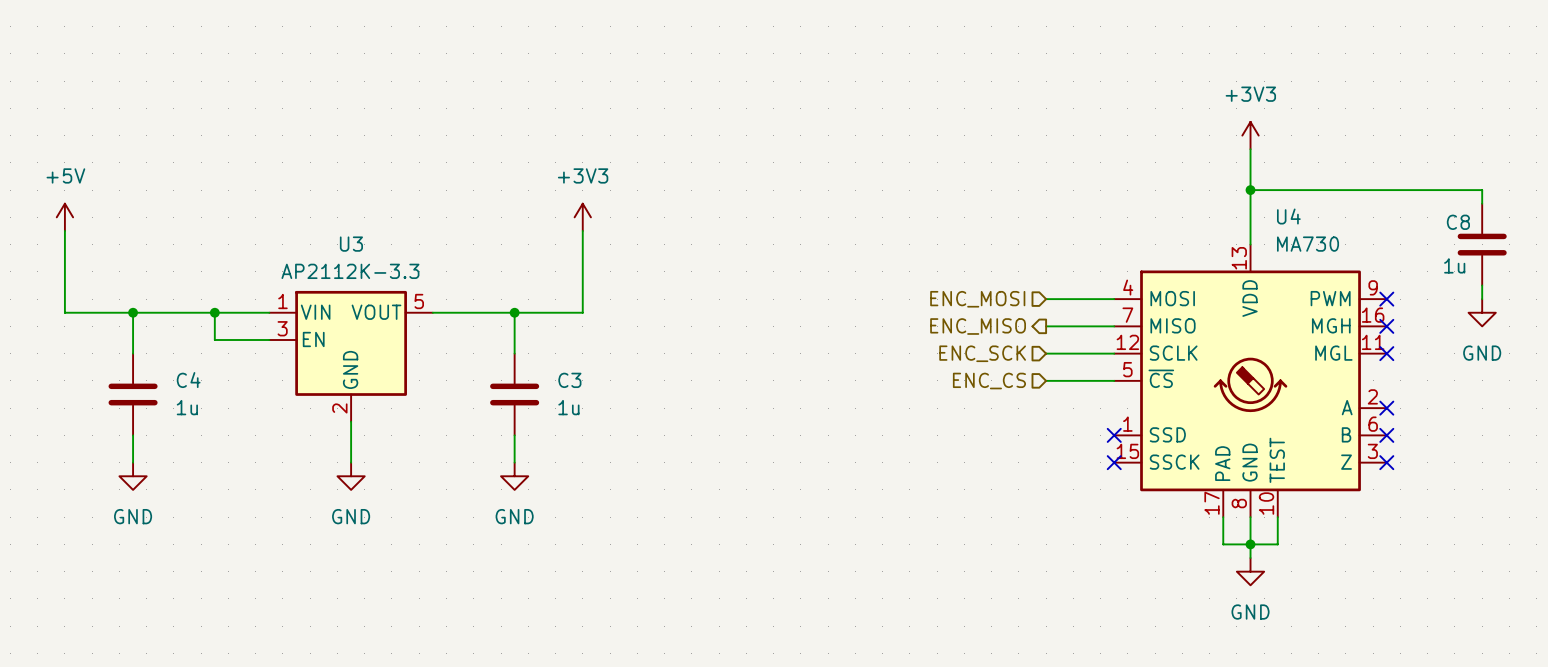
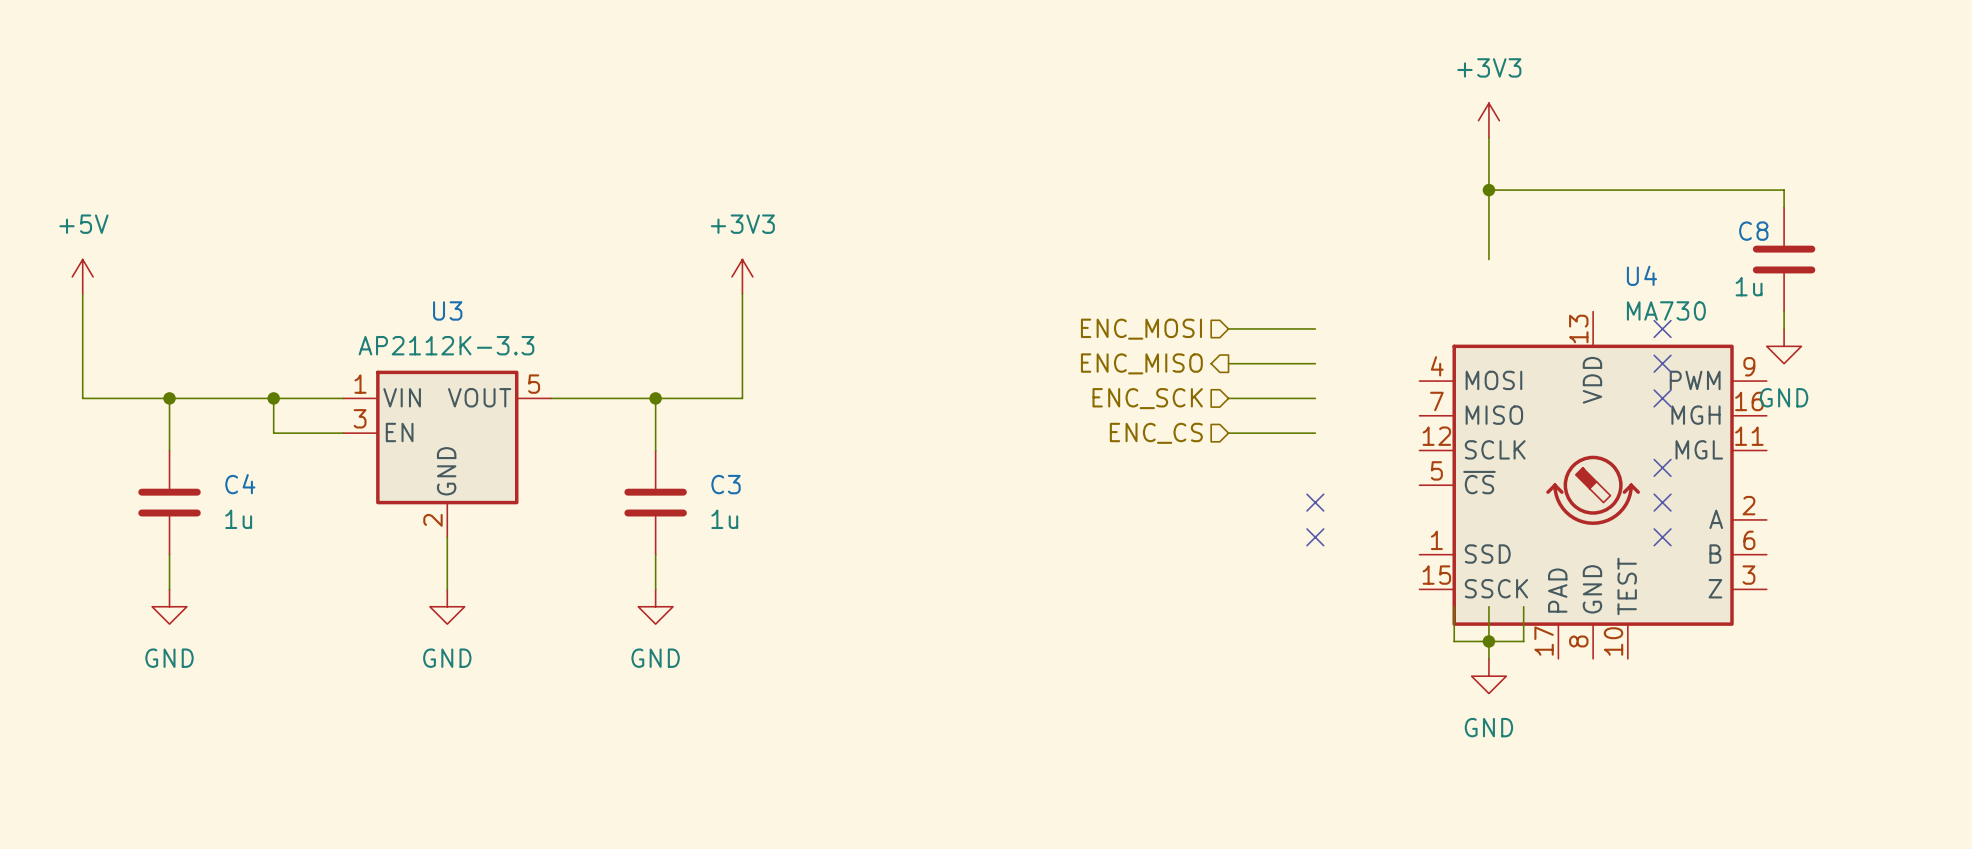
power symbol position: +3V3 (1250, 135) -> +3V3 (1488, 120)
junction: none -> (1488, 190)
wire: (1250, 149) (1250, 244) -> (1488, 138) (1488, 259)
wire: (1250, 190) (1482, 190) (1482, 203) -> (1488, 190) (1784, 190) (1784, 207)
junction: (1250, 190) -> none
C8 position: (1482, 244) -> (1784, 259)
no-connect mark: none -> (1662, 328)
no-connect mark: none -> (1662, 363)
wire: (1482, 285) (1482, 299) -> (1784, 311) (1784, 328)
hierarchical label position: ENC_MOSI (977, 299) -> ENC_MOSI (1141, 329)
wire: (1046, 299) (1114, 299) -> (1228, 328) (1315, 328)
no-connect mark: (1386, 299) -> none
no-connect mark: none -> (1662, 398)
power symbol position: GND (1482, 312) -> GND (1784, 346)
hierarchical label position: ENC_MISO (978, 326) -> ENC_MISO (1141, 363)
wire: (1046, 326) (1114, 326) -> (1228, 363) (1315, 363)
no-connect mark: (1386, 326) -> none
hierarchical label position: ENC_SCK (982, 353) -> ENC_SCK (1147, 398)
wire: (1046, 353) (1114, 353) -> (1228, 398) (1315, 398)
no-connect mark: (1386, 353) -> none
no-connect mark: none -> (1662, 467)
wire: (1046, 380) (1114, 380) -> (1228, 433) (1315, 433)
hierarchical label position: ENC_CS (989, 381) -> ENC_CS (1156, 433)
no-connect mark: none -> (1315, 502)
no-connect mark: none -> (1662, 502)
no-connect mark: (1386, 408) -> none
no-connect mark: none -> (1315, 537)
no-connect mark: none -> (1662, 537)
no-connect mark: (1114, 435) -> none
no-connect mark: (1386, 435) -> none
no-connect mark: (1114, 462) -> none
no-connect mark: (1386, 462) -> none
junction: none -> (1488, 641)
wire: (1223, 517) (1223, 544) (1277, 544) (1277, 517) -> (1454, 606) (1454, 641) (1523, 641) (1523, 606)
wire: (1250, 517) (1250, 558) -> (1488, 606) (1488, 658)
junction: (1250, 544) -> none
power symbol position: GND (1250, 571) -> GND (1488, 676)

